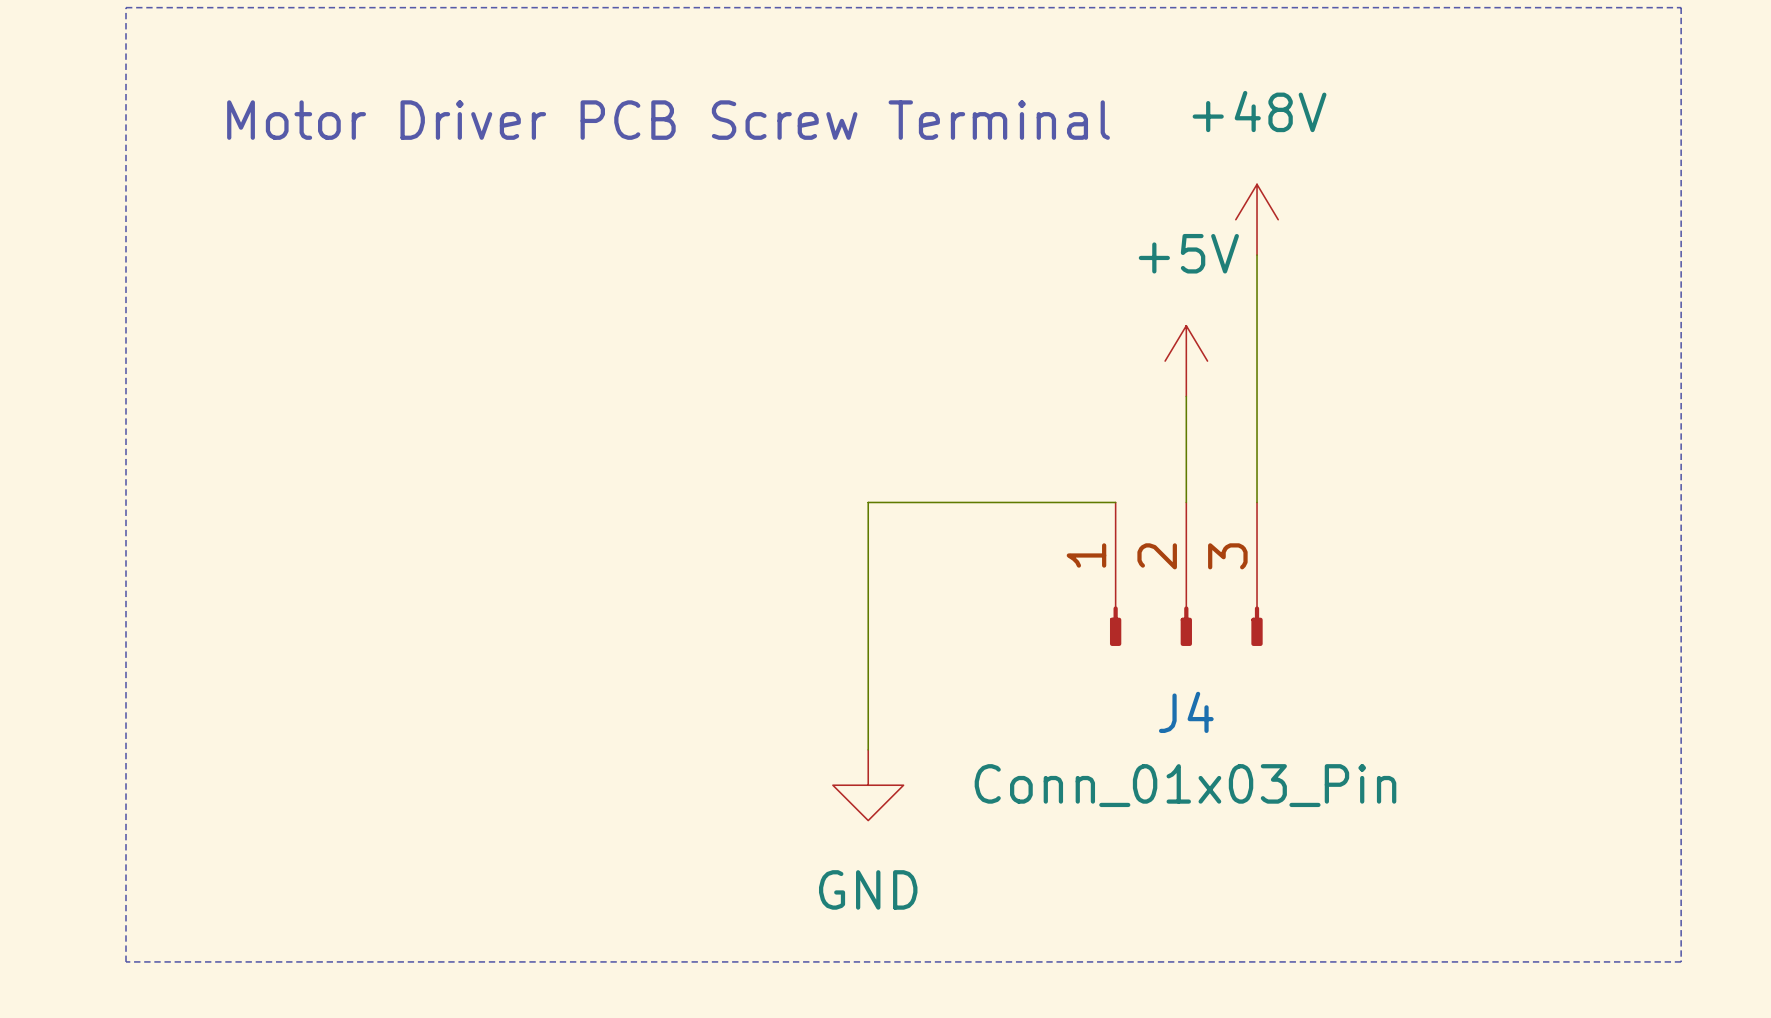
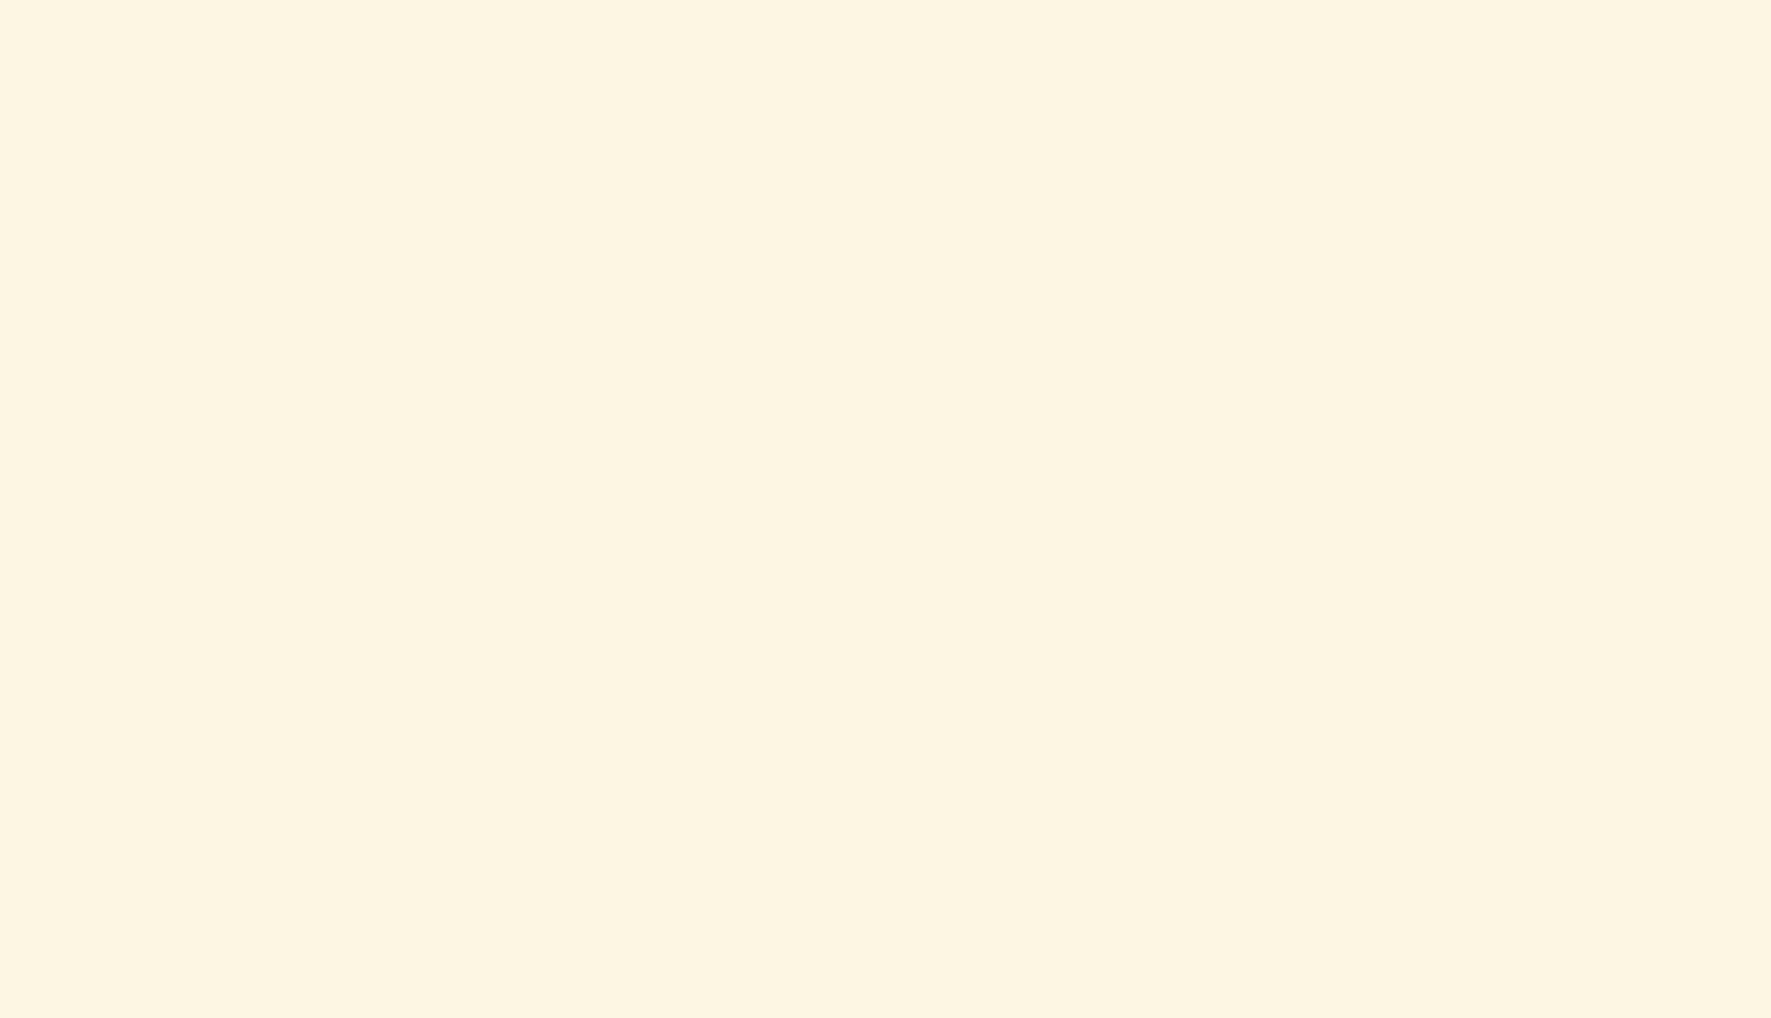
line: (126, 7) (1681, 7) (1681, 961) (126, 961) (126, 7) -> none
text: Motor Driver PCB Screw Terminal (668, 120) -> none
power symbol: +48V (1257, 219) -> none
wire: (1257, 255) (1257, 502) -> none
power symbol: +5V (1186, 361) -> none
wire: (1186, 396) (1186, 502) -> none
wire: (1115, 502) (868, 502) (868, 749) -> none
J4: Conn_01x03_Pin (1186, 574) -> none
power symbol: GND (868, 785) -> none

